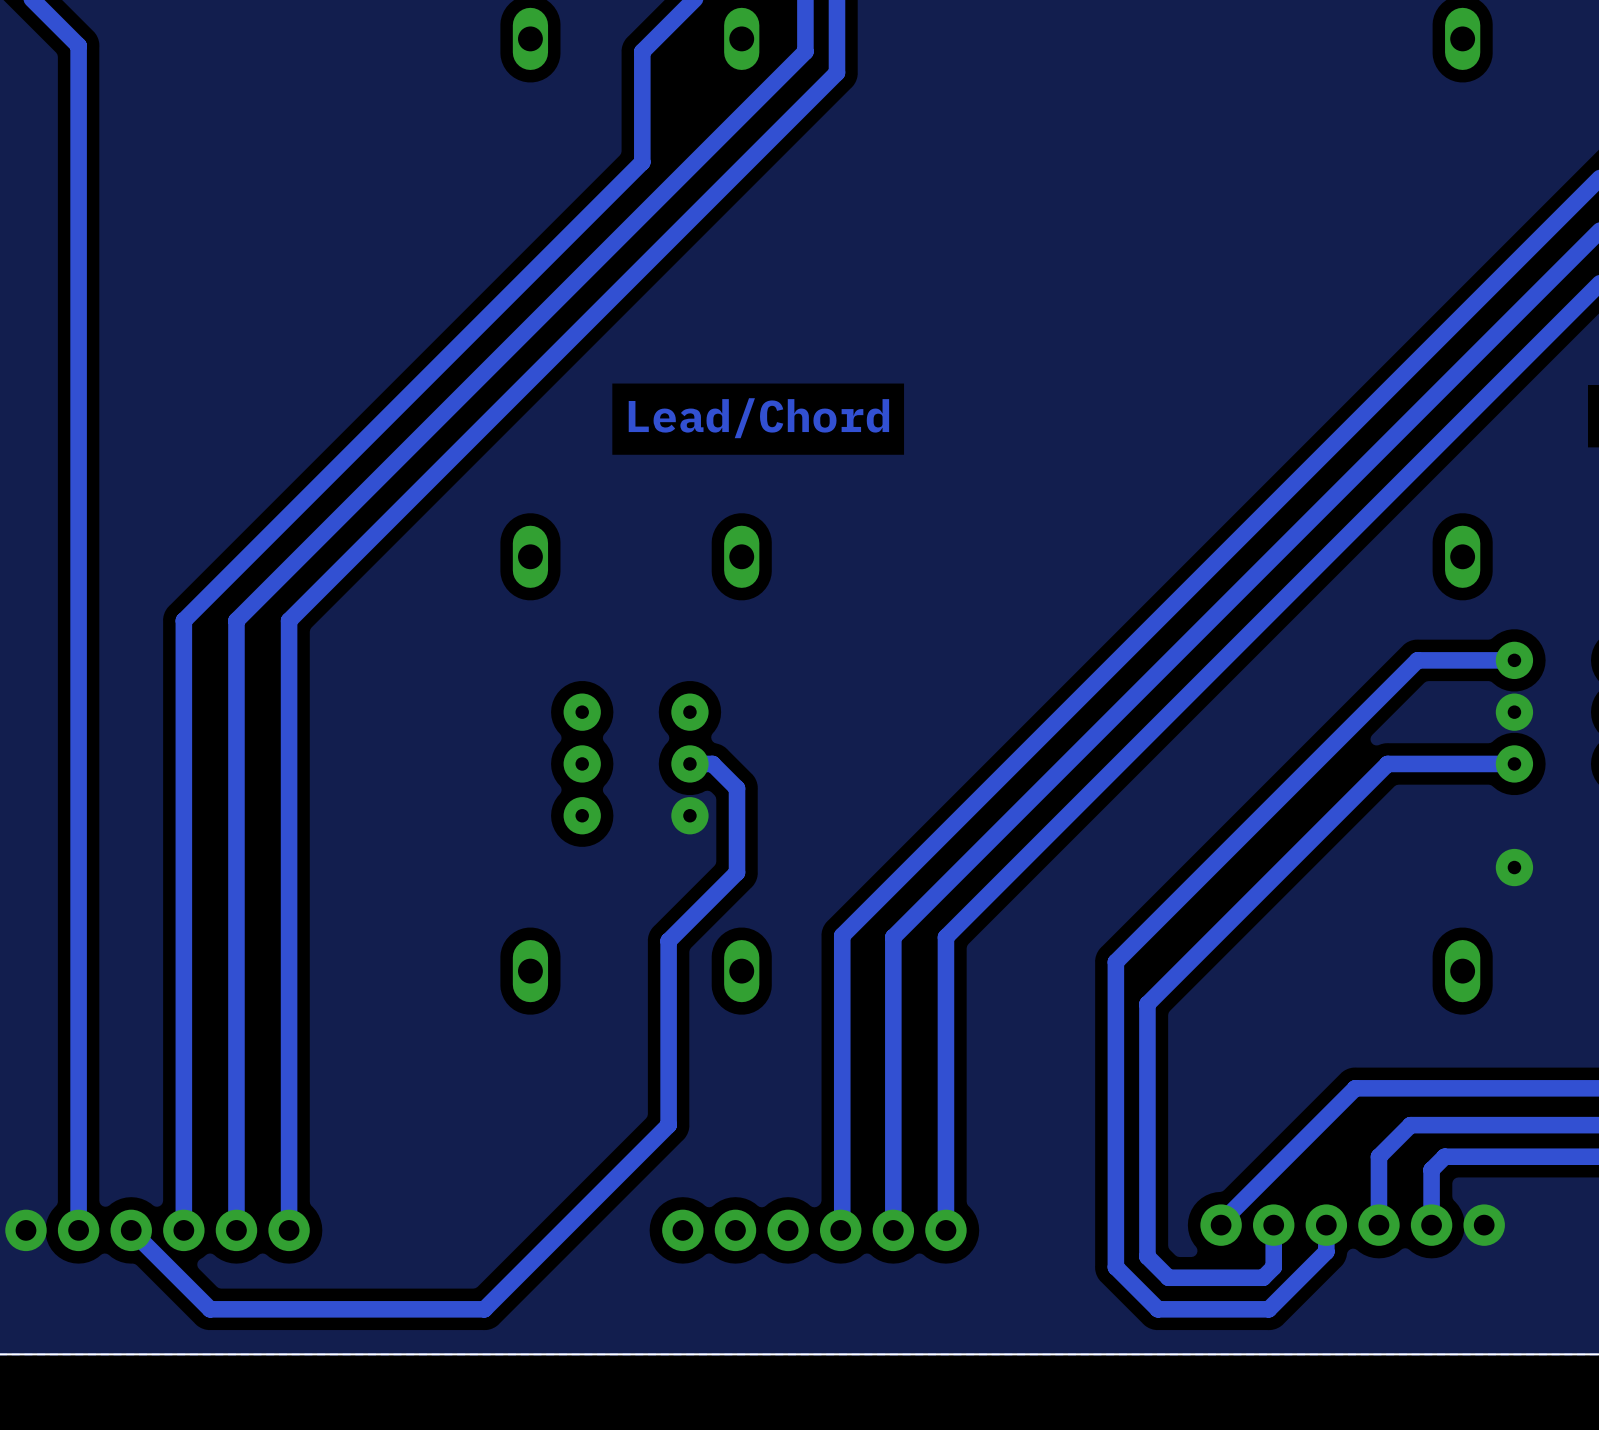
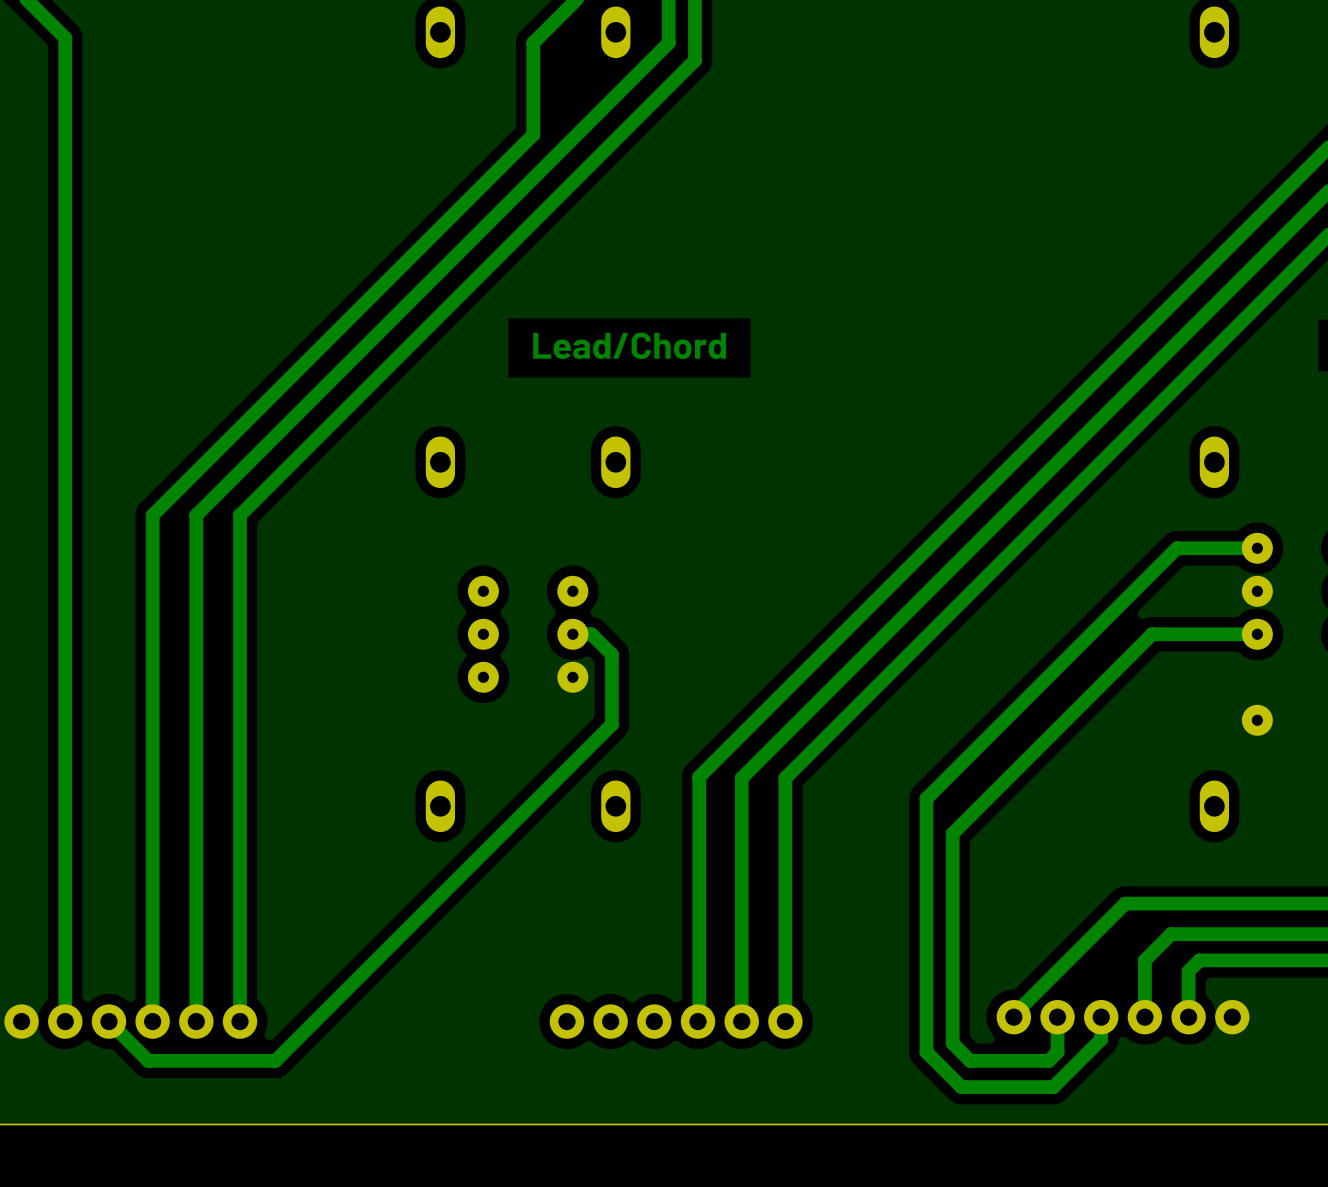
bottom track: (668, 940) (668, 1125) (484, 1309) (210, 1309) (178, 1277) -> (555, 781) (275, 1060) (148, 1060)

